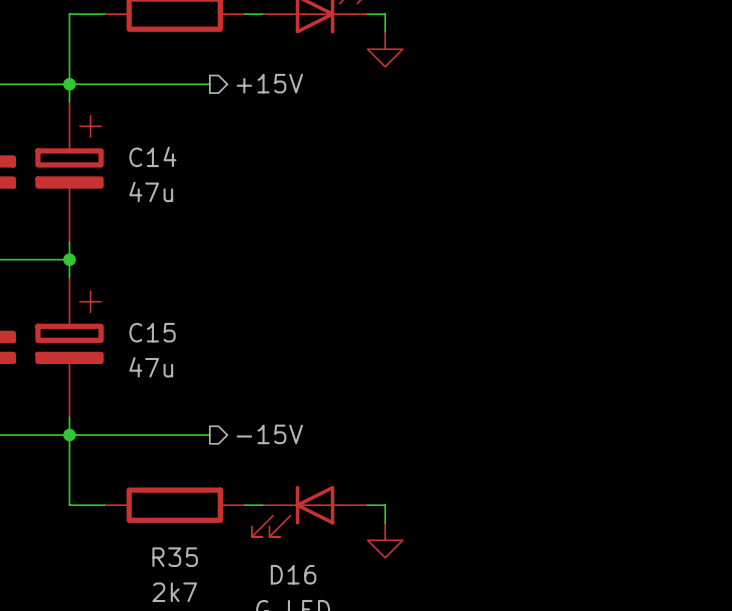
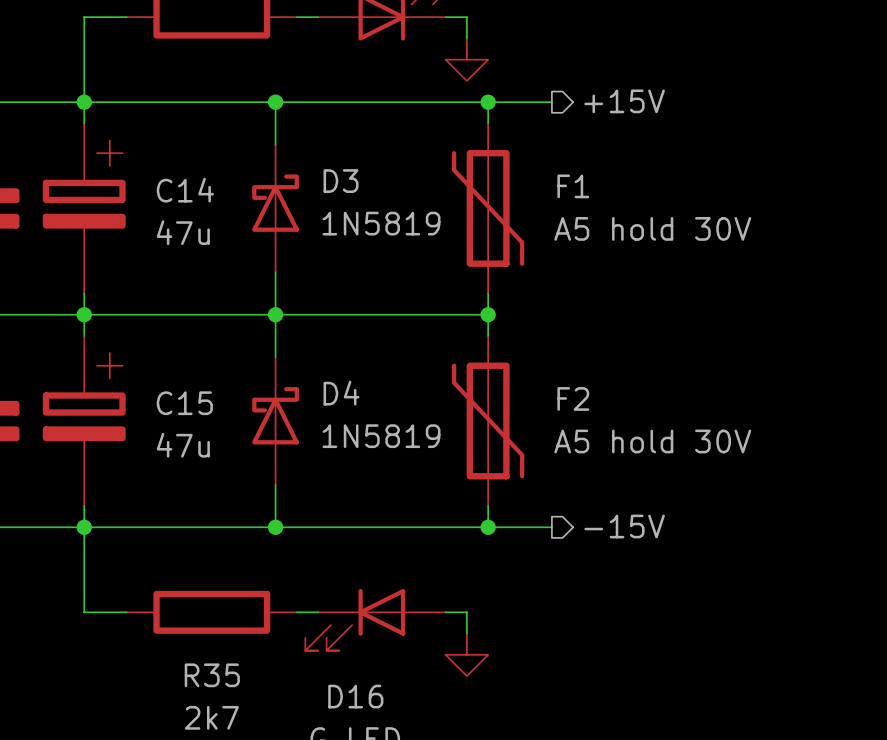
hierarchical label position: +15V (269, 83) -> +15V (624, 101)
wire: none -> (254, 102) (551, 102)
wire: none -> (275, 102) (275, 144)
junction: none -> (275, 102)
wire: none -> (488, 102) (488, 123)
junction: none -> (488, 102)
D3: none -> 1N5819 (275, 208)
F1: none -> A5 hold 30V (488, 208)
wire: none -> (275, 272) (275, 357)
wire: none -> (488, 293) (488, 335)
wire: none -> (84, 314) (488, 314)
junction: none -> (275, 314)
junction: none -> (488, 314)
D4: none -> 1N5819 (275, 421)
F2: none -> A5 hold 30V (488, 421)
wire: none -> (275, 484) (275, 527)
wire: none -> (488, 506) (488, 527)
hierarchical label position: -15V (269, 434) -> -15V (624, 526)
wire: none -> (254, 527) (551, 527)
junction: none -> (275, 527)
junction: none -> (488, 527)

